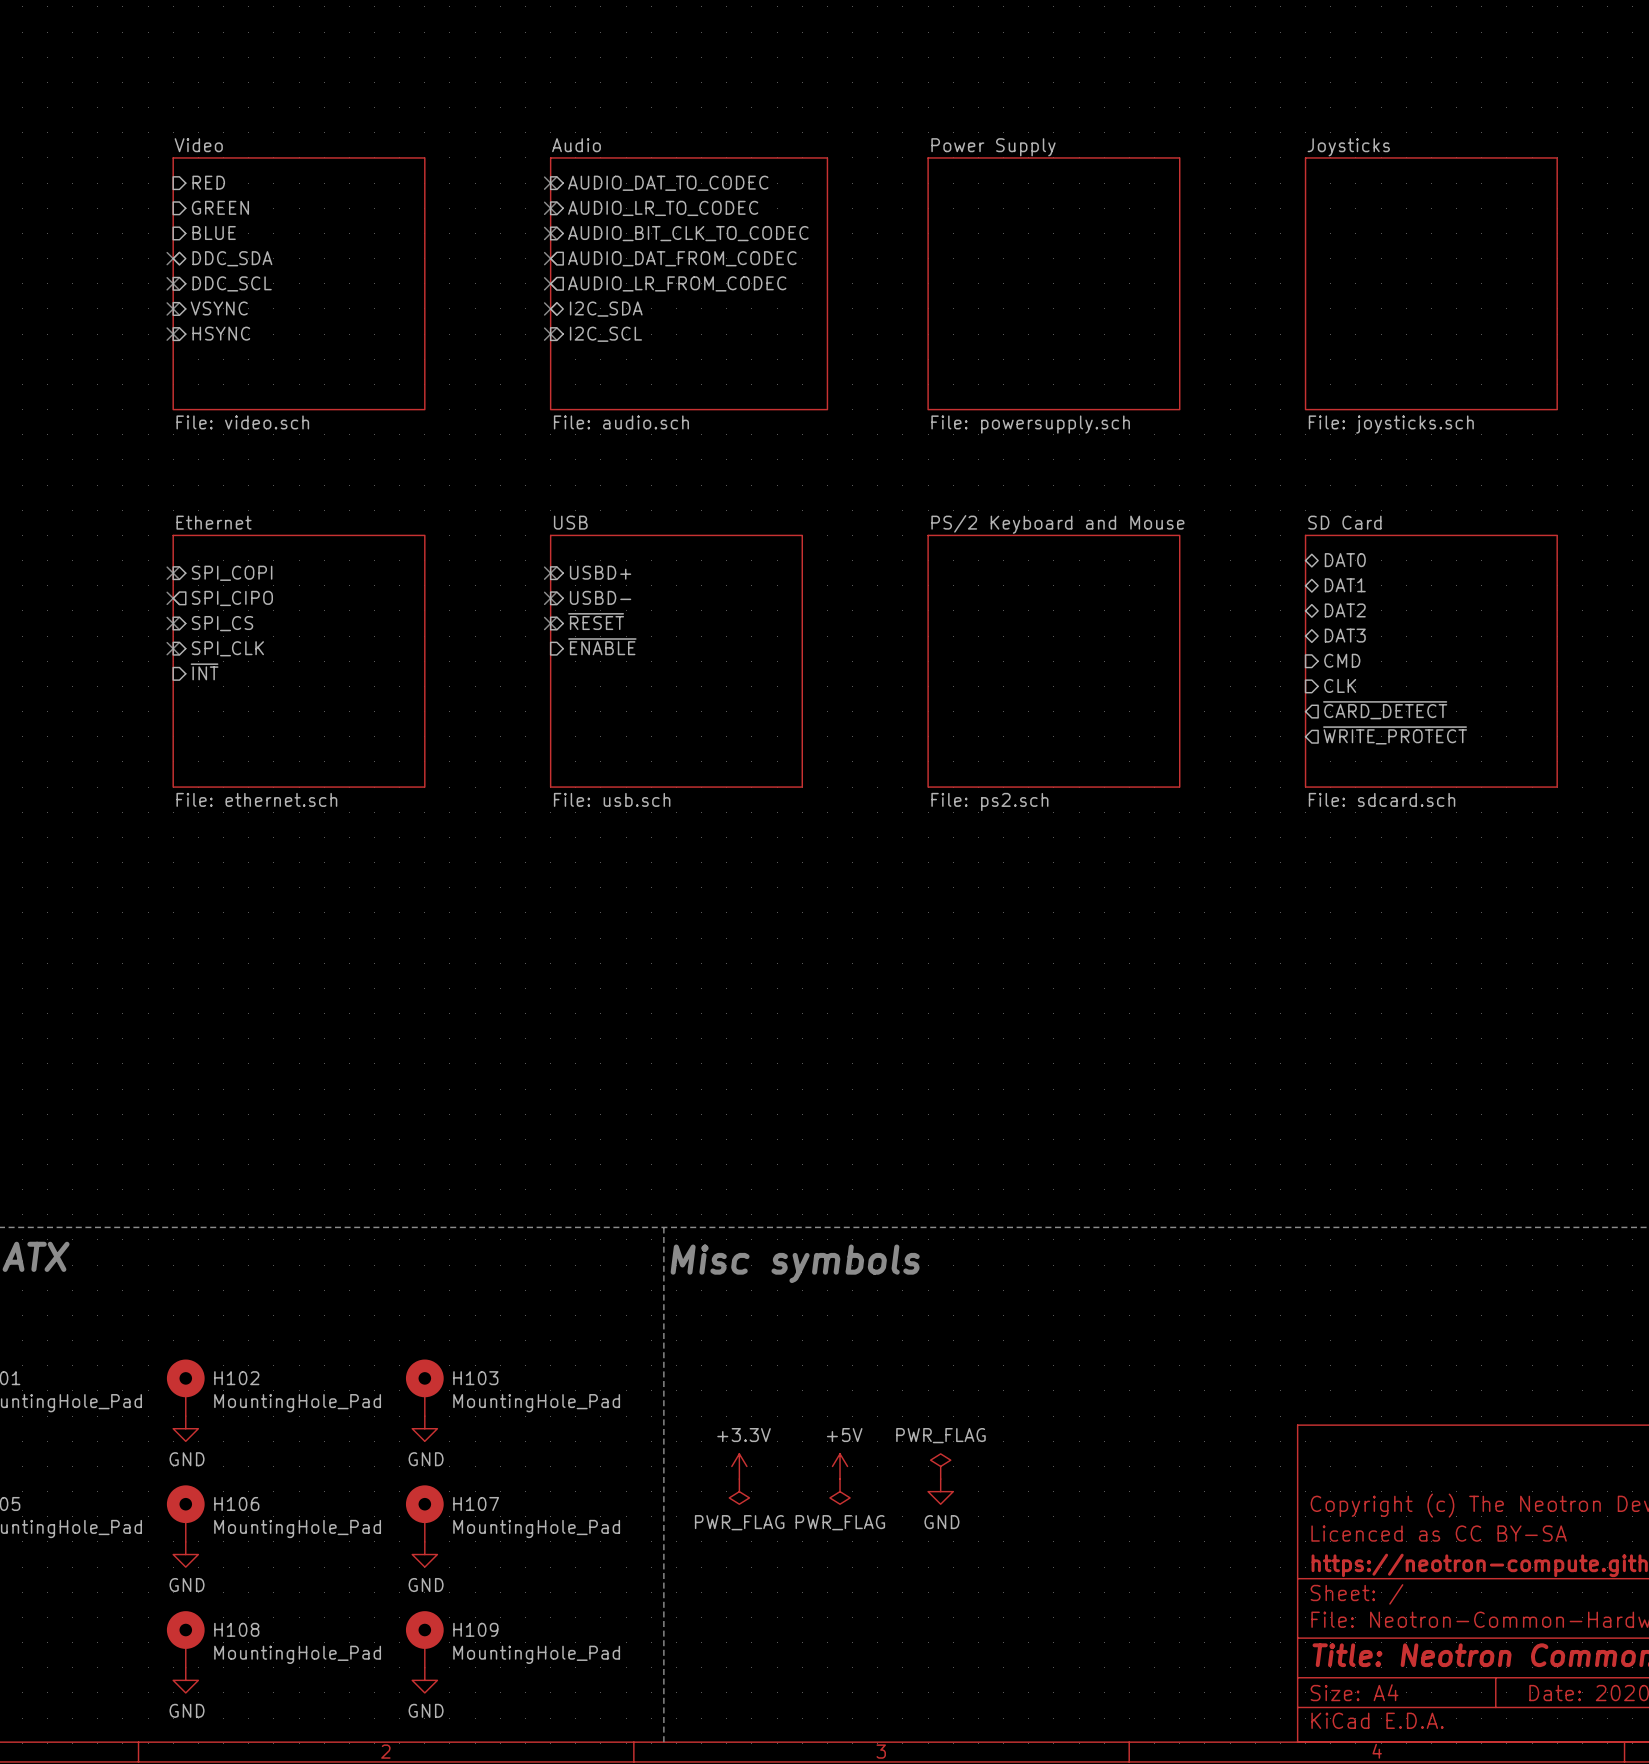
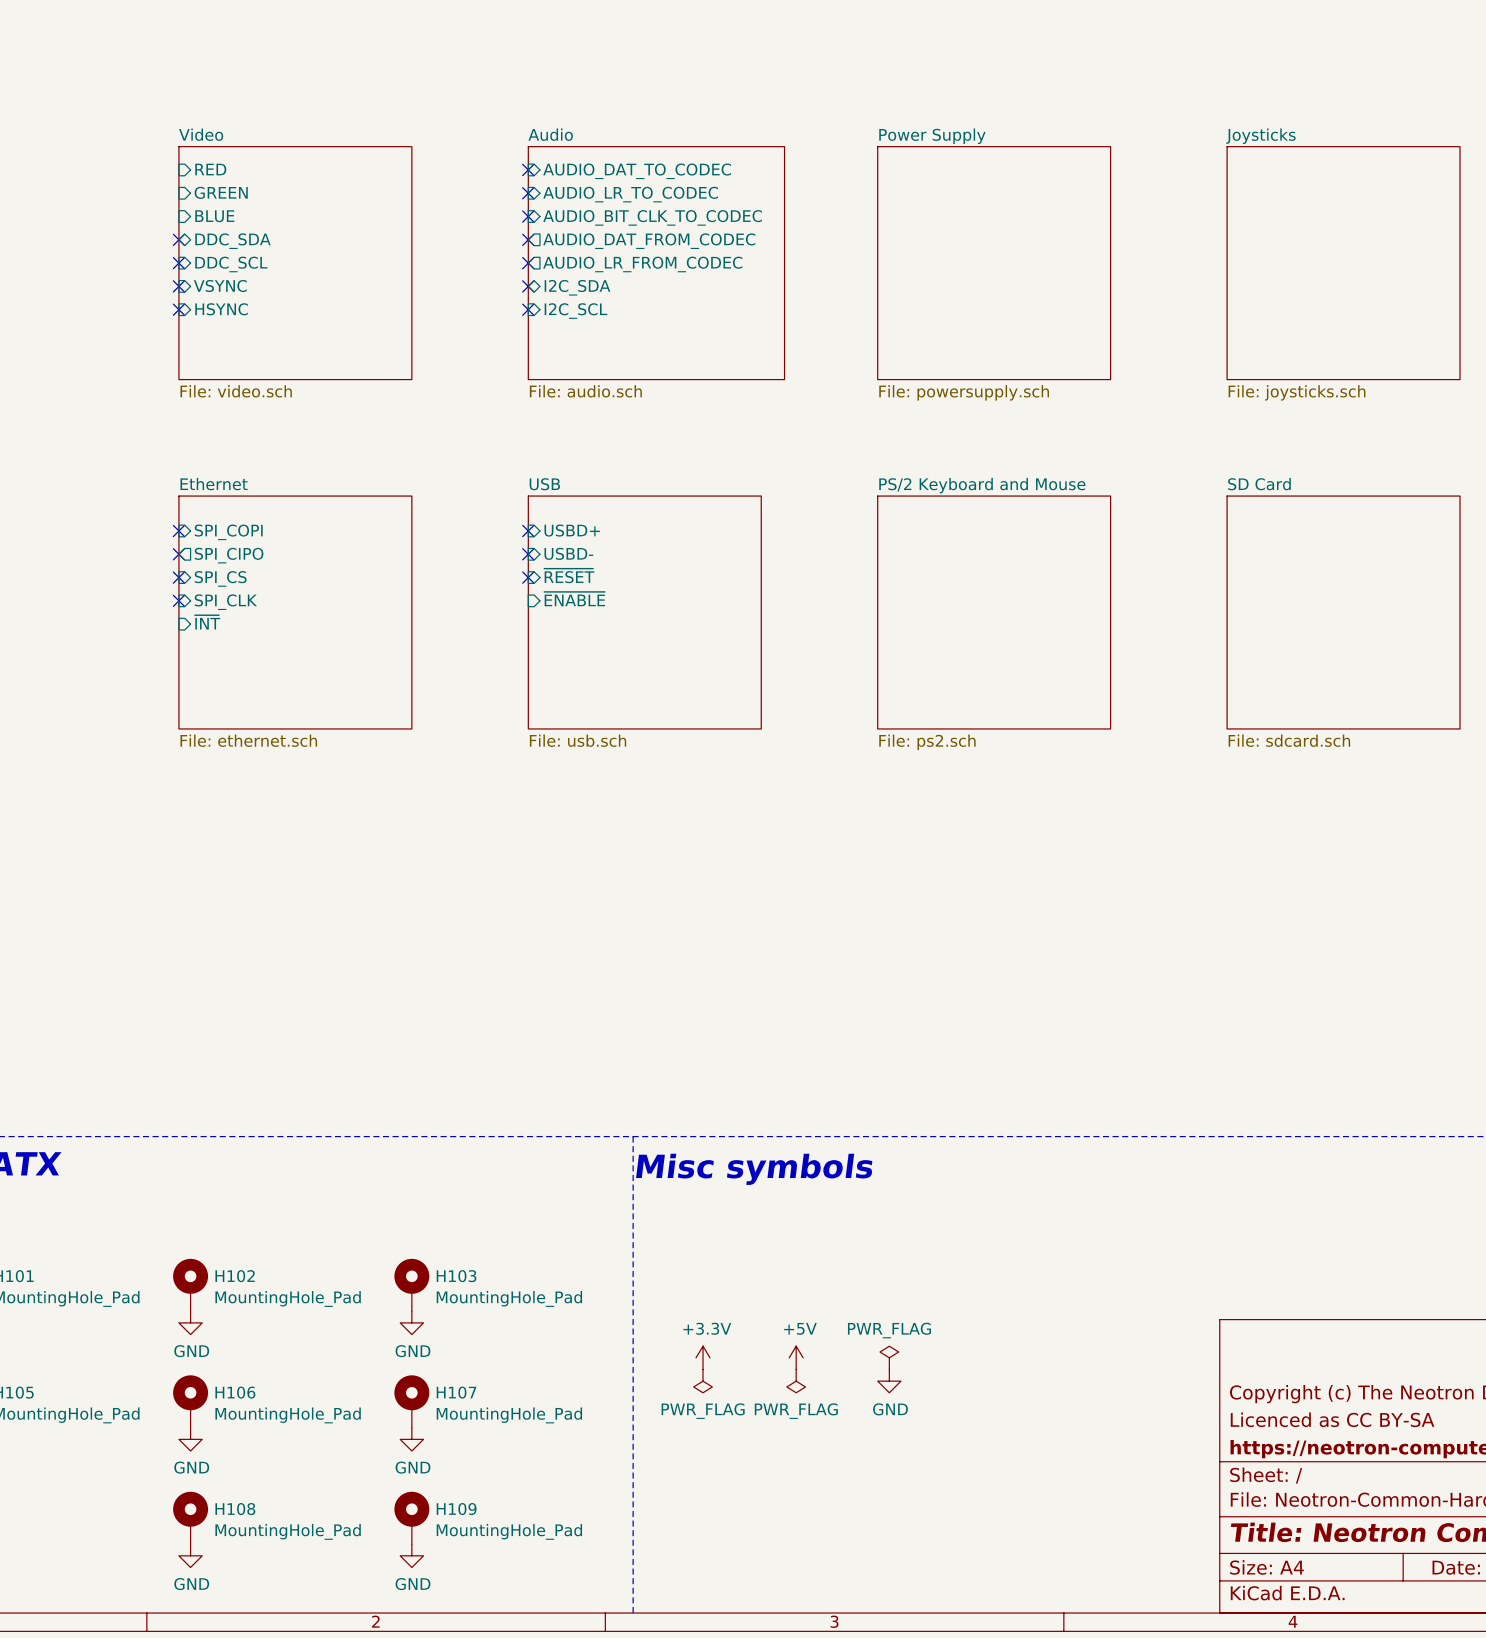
sheet pin: DAT0 (1345, 560) -> none
sheet pin: DAT1 (1345, 585) -> none
sheet pin: DAT2 (1345, 610) -> none
sheet pin: DAT3 (1345, 635) -> none
sheet pin: CMD (1342, 660) -> none
sheet pin: CLK (1340, 685) -> none
sheet pin: ~{CARD_DETECT} (1385, 710) -> none
sheet pin: ~{WRITE_PROTECT} (1395, 735) -> none

